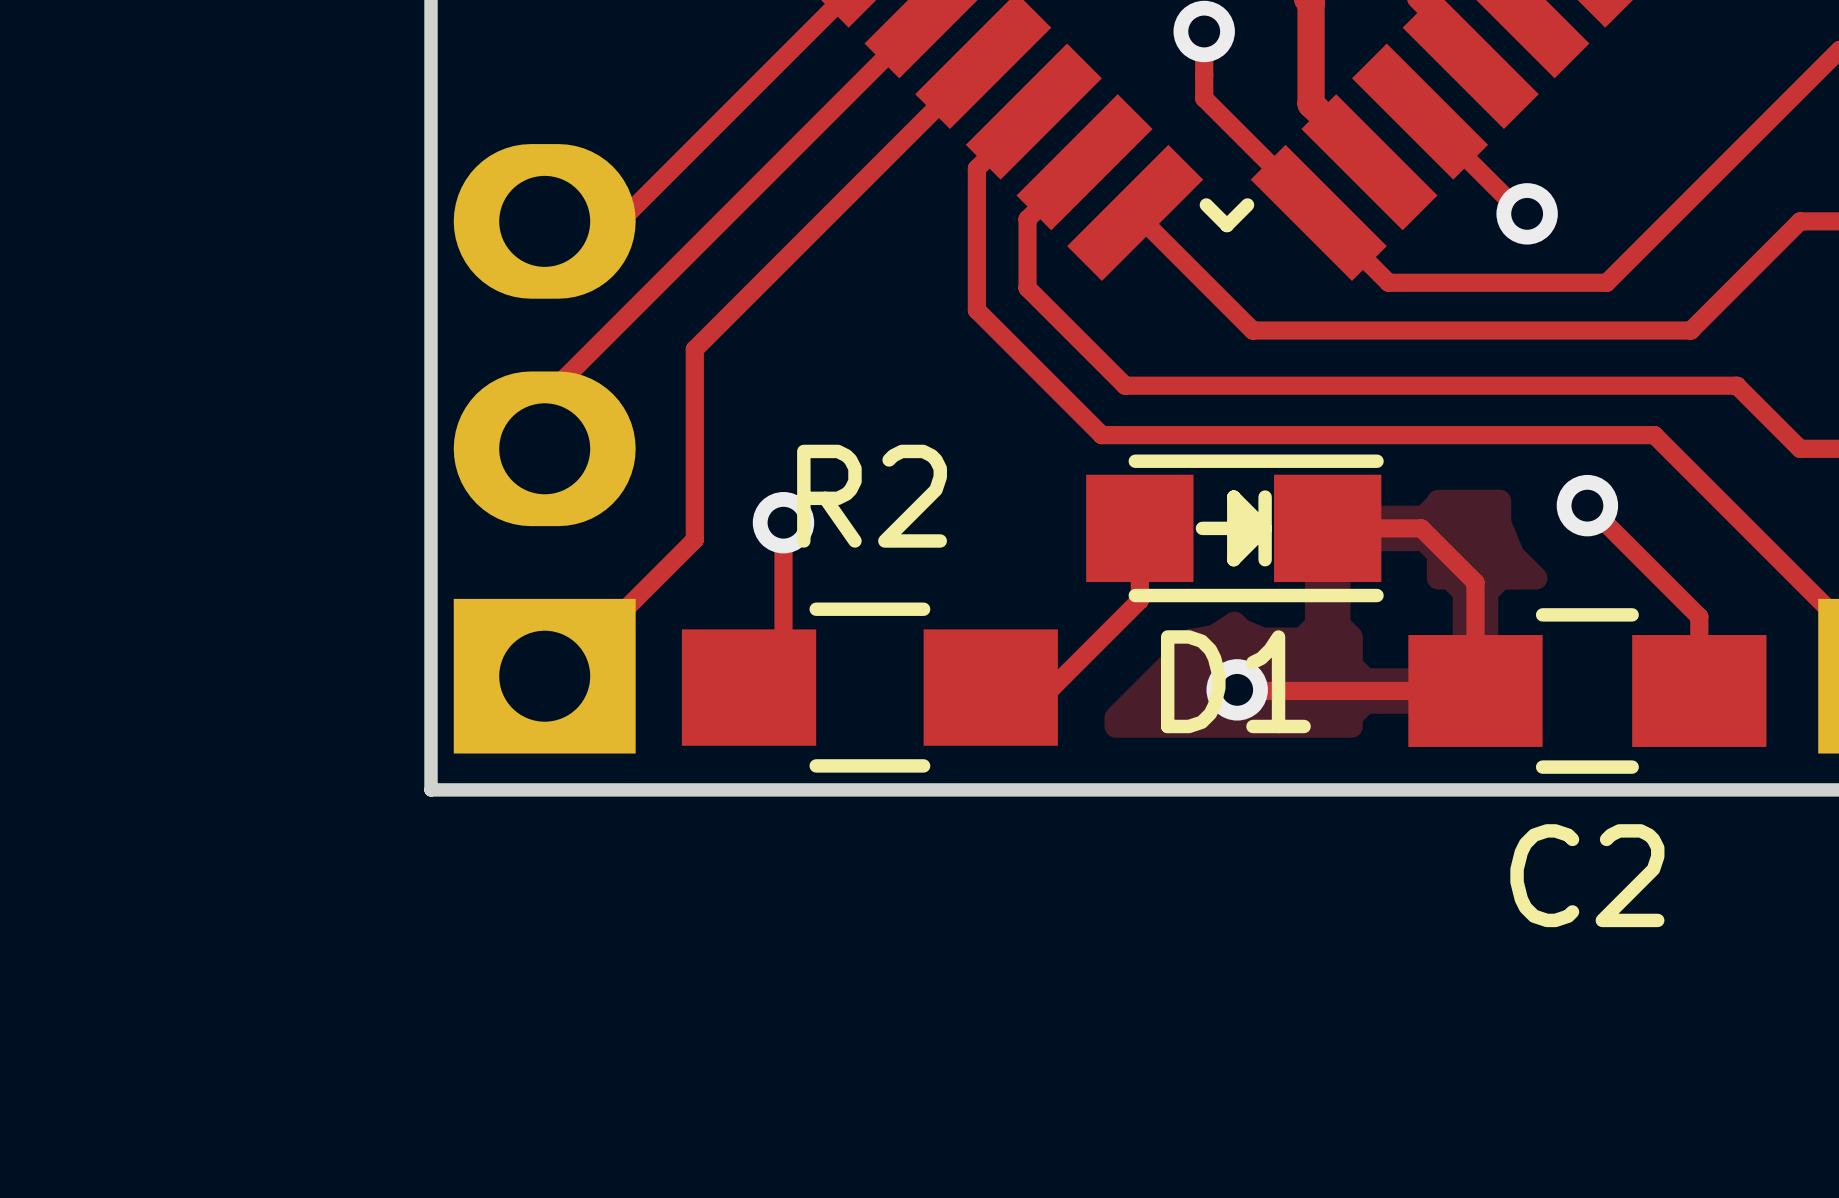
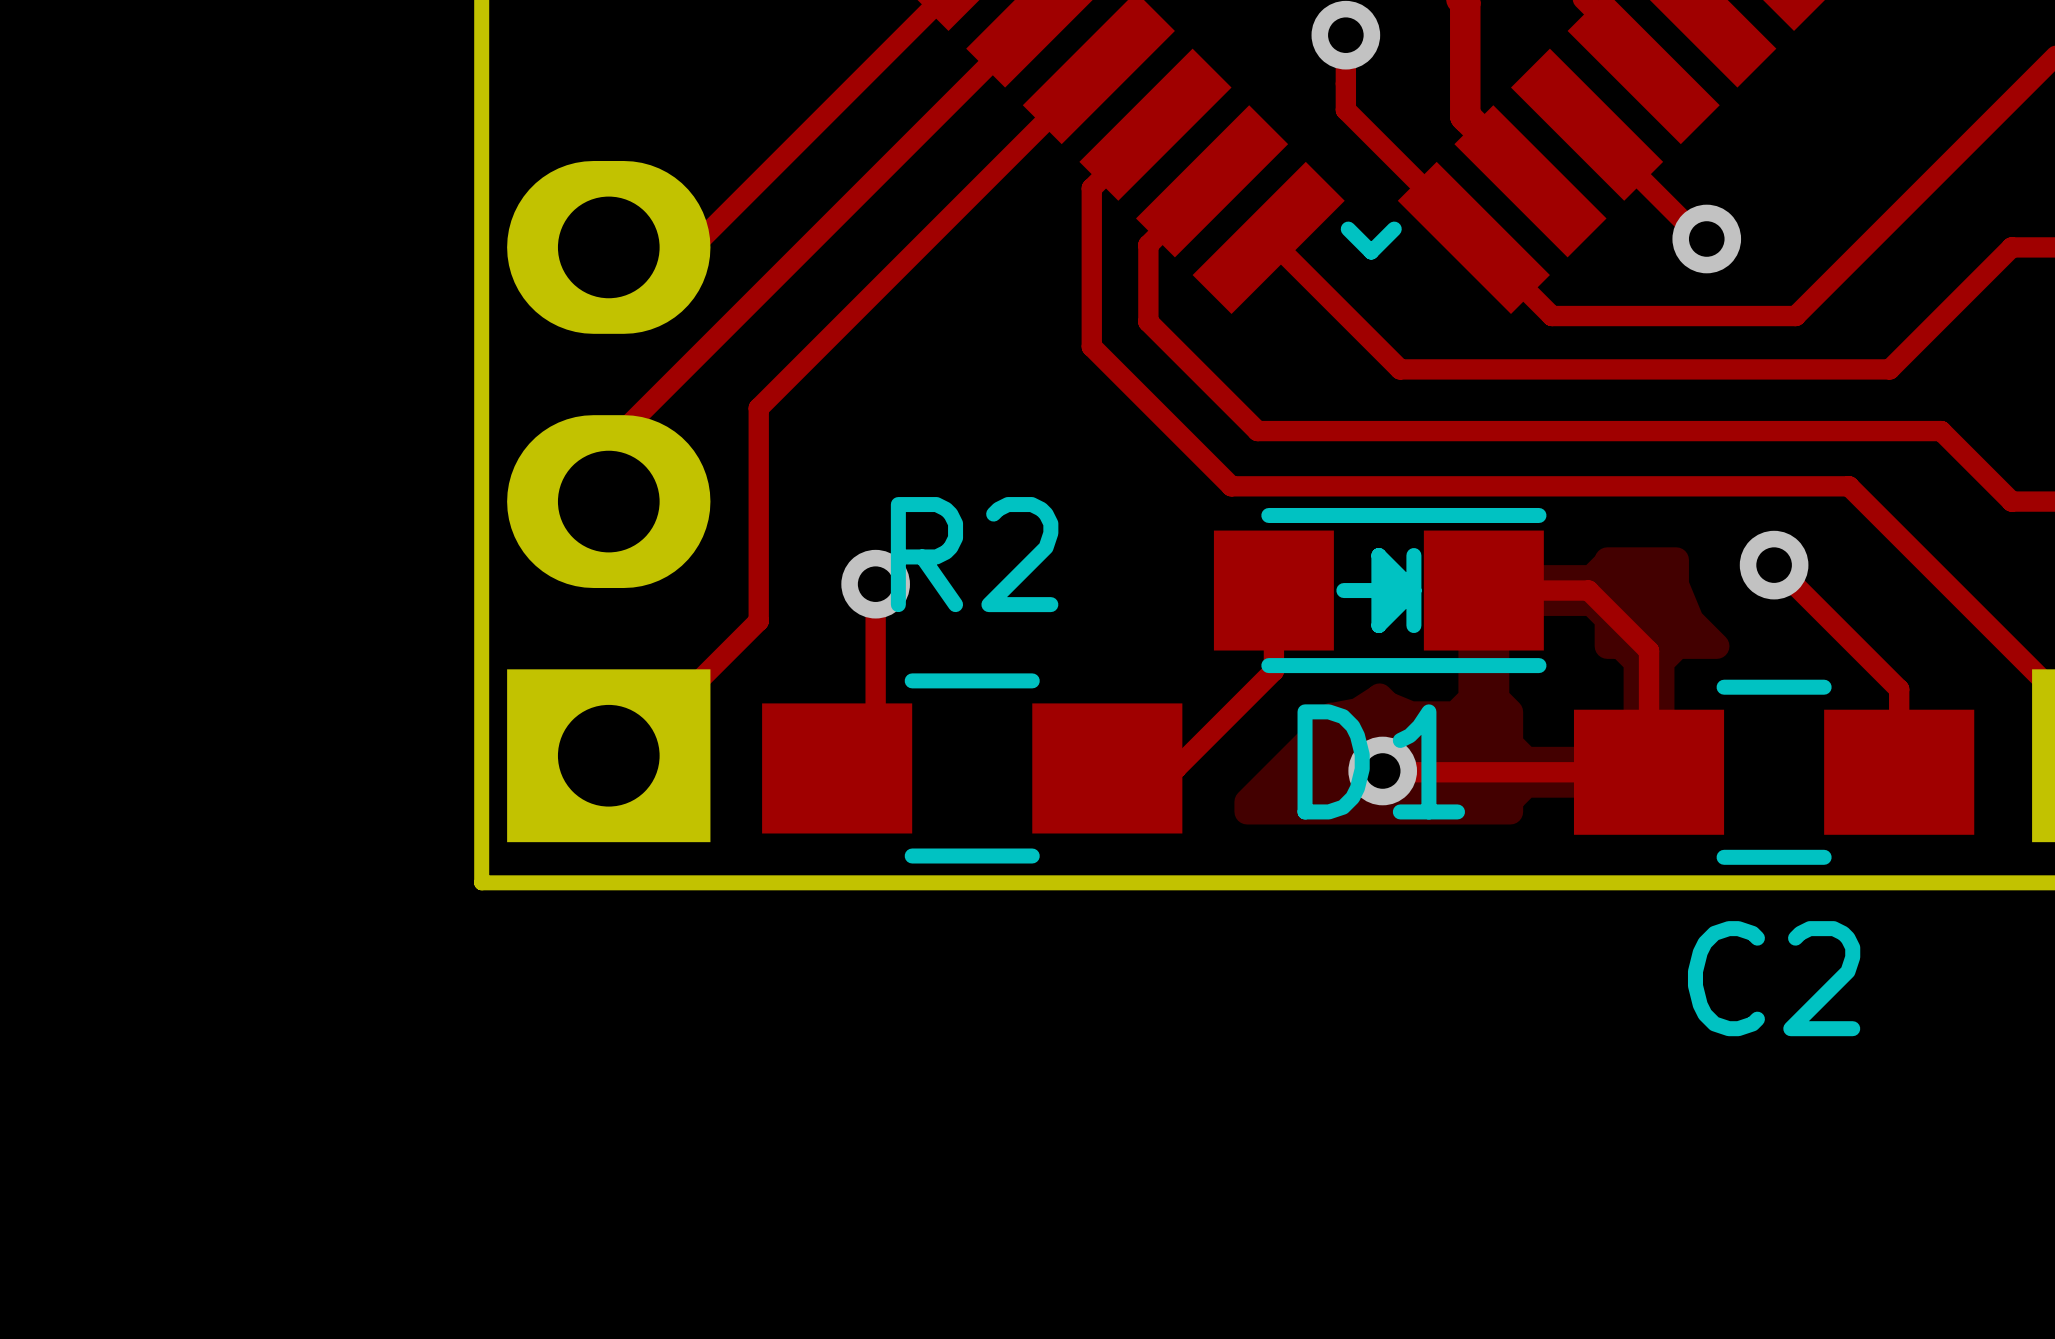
track: (694, 349) (694, 539) (678, 555) -> (776, 390) (758, 408) (758, 621)

